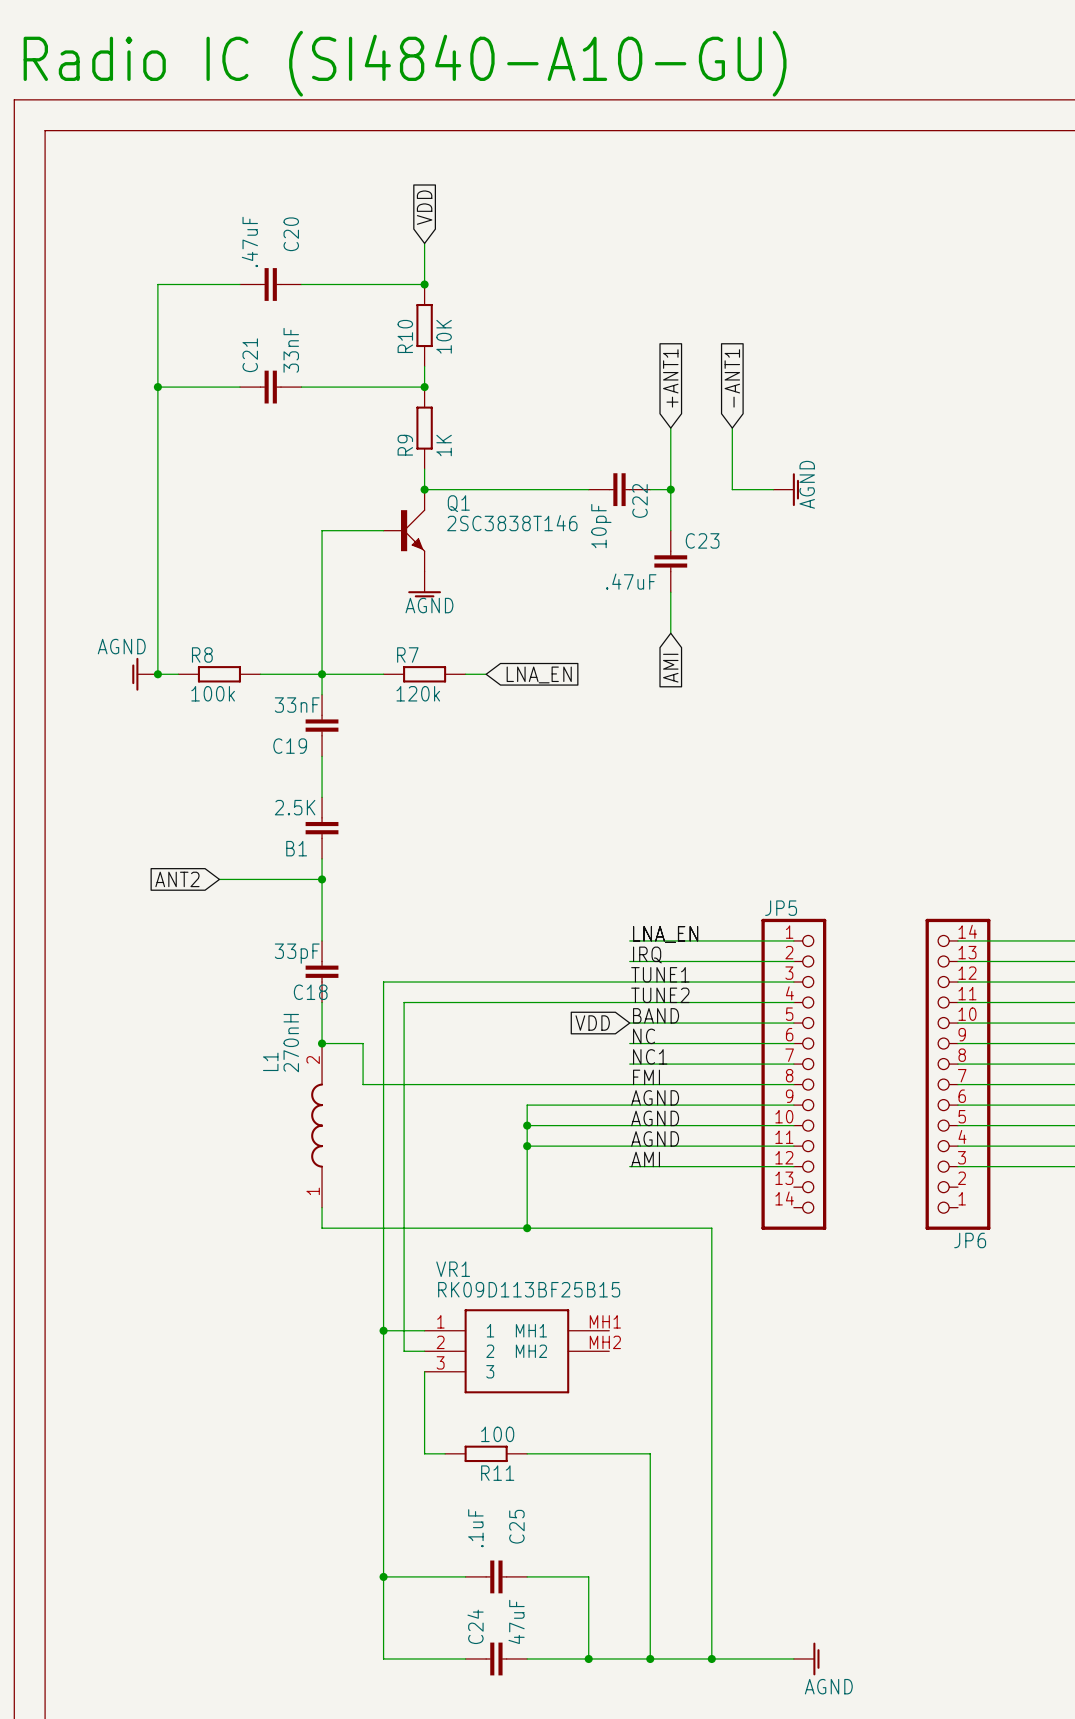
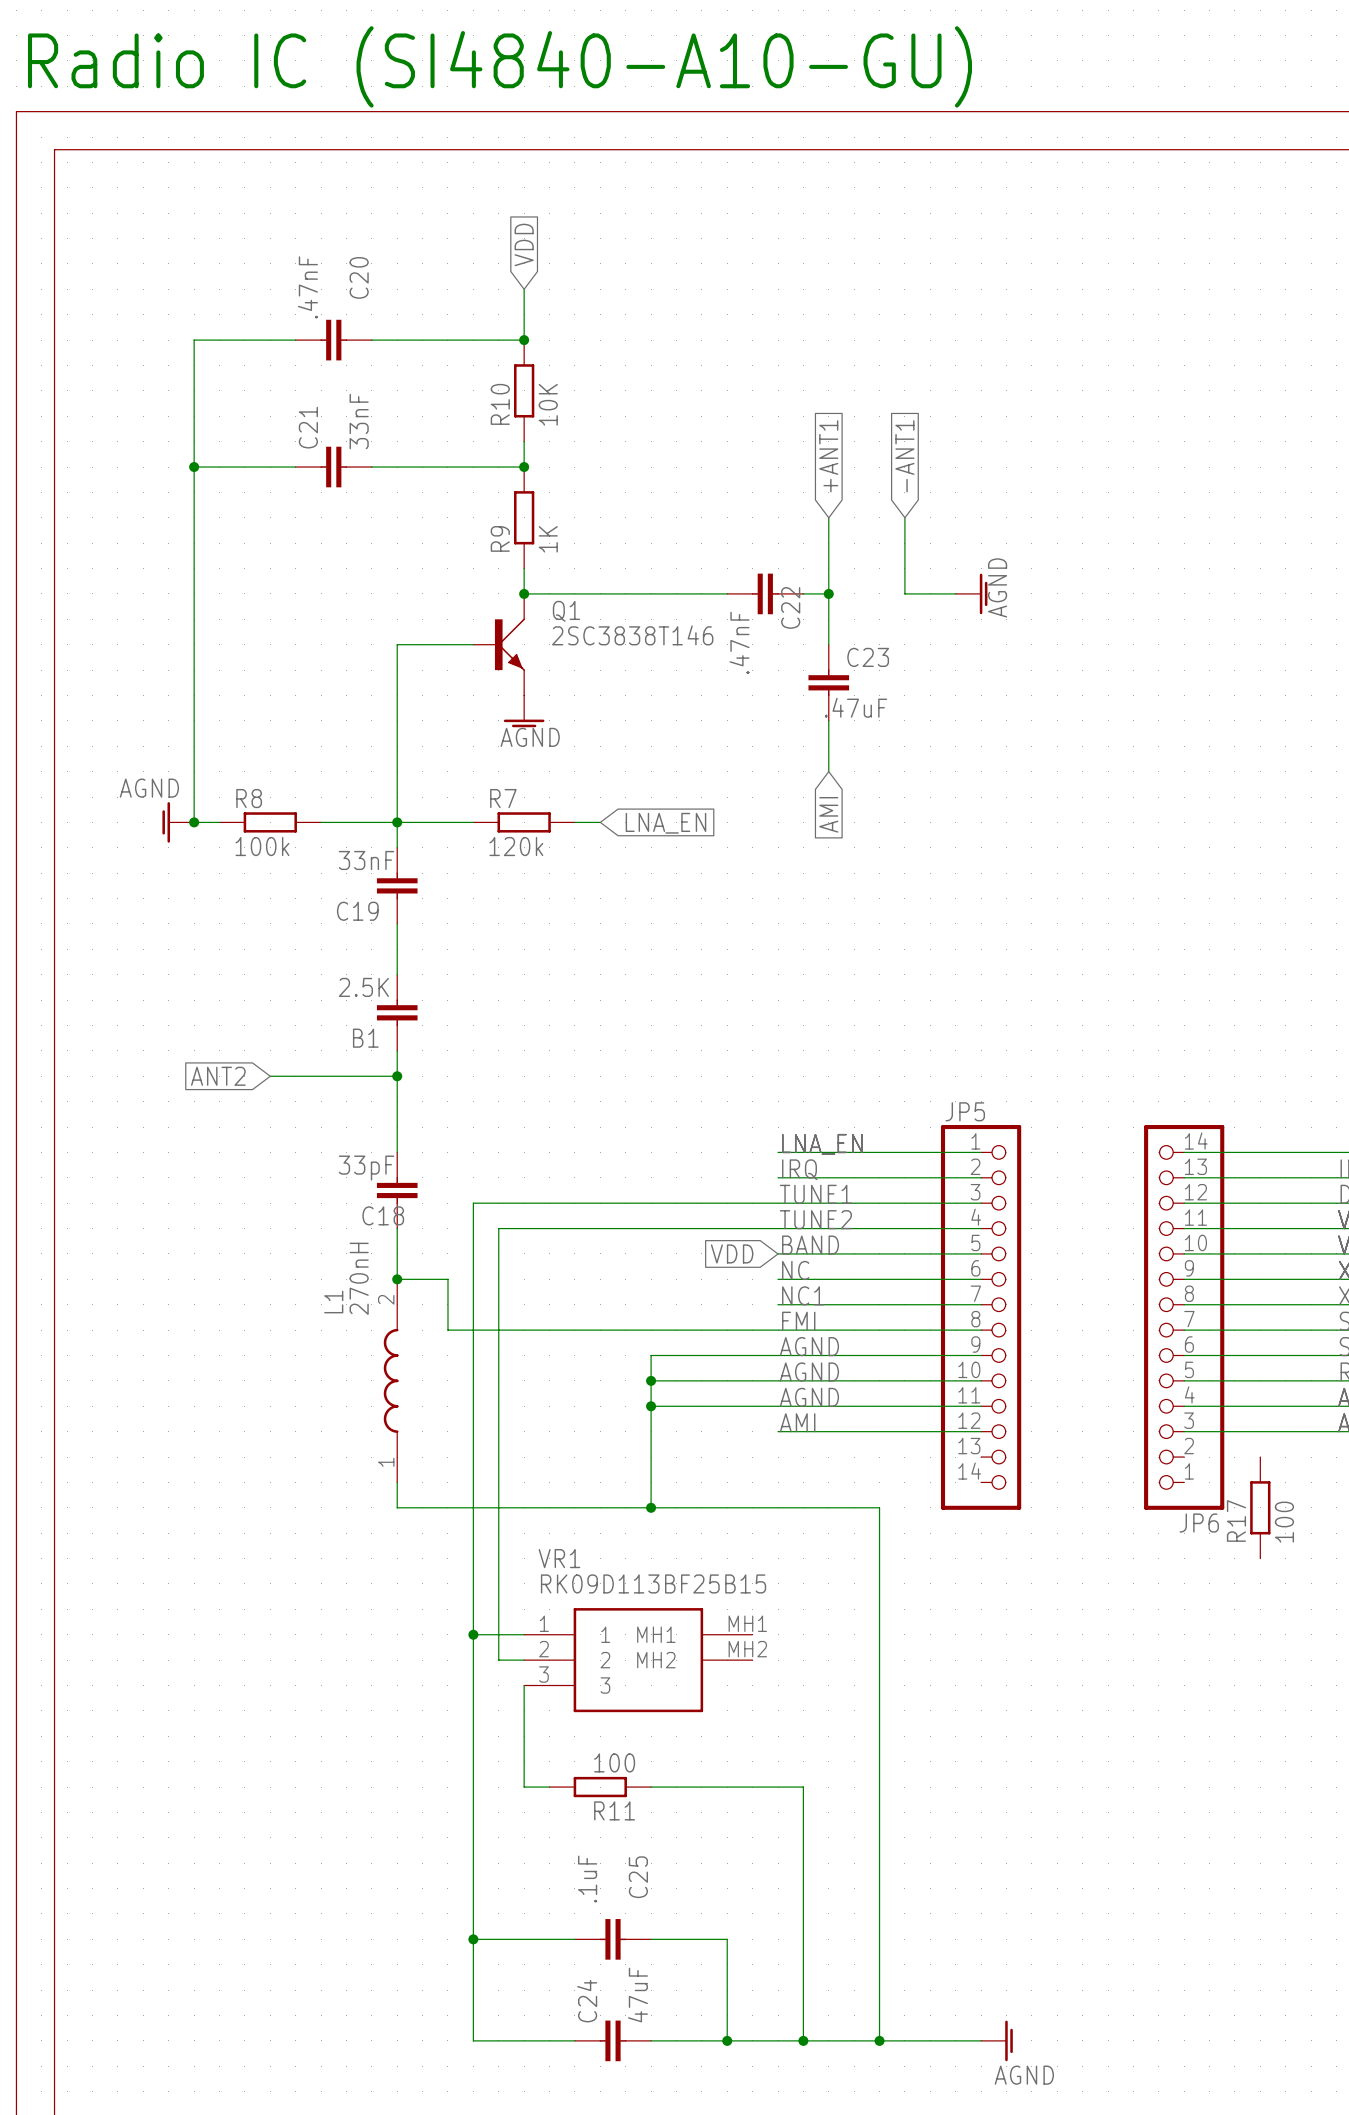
C20 value: .47uF (249, 241) -> .47nF (307, 287)
C22 value: 10pF (601, 526) -> .47nF (739, 642)
C23 value position: .47uF (631, 581) -> .47uF (856, 707)
R17: none -> 100 (1260, 1507)

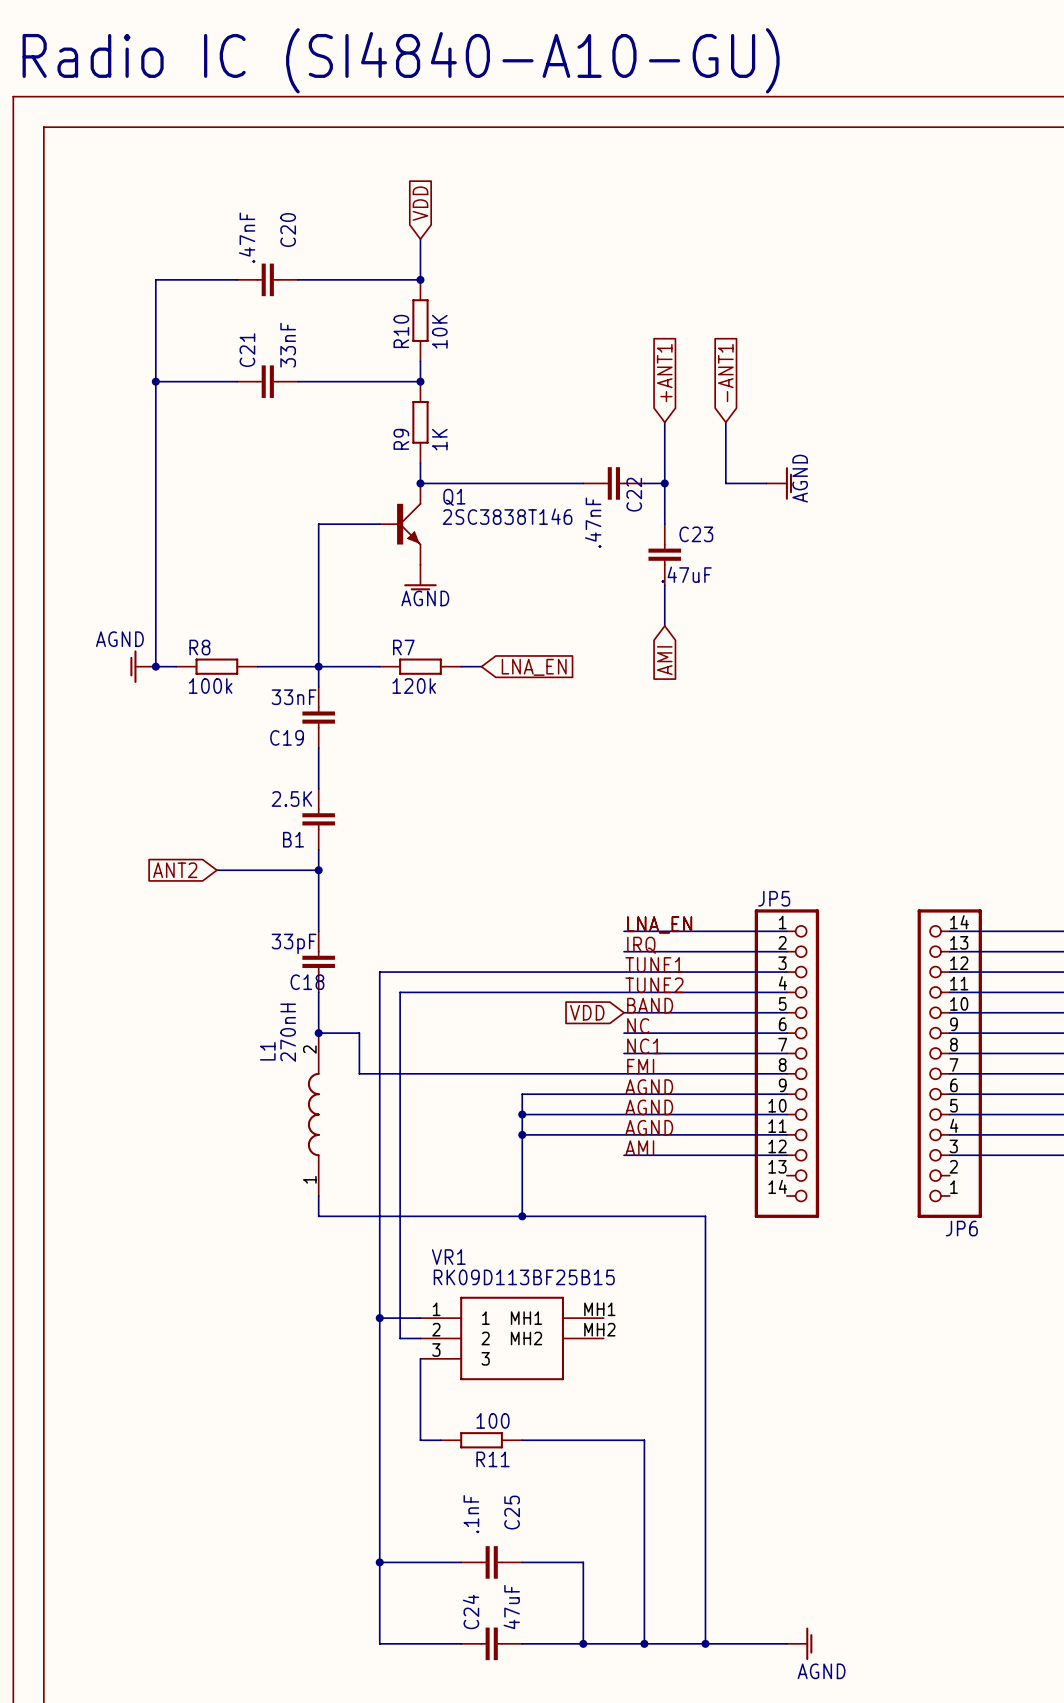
R17: 100 (1260, 1507) -> none
C25 value: .1uF (587, 1879) -> .1nF (471, 1514)

